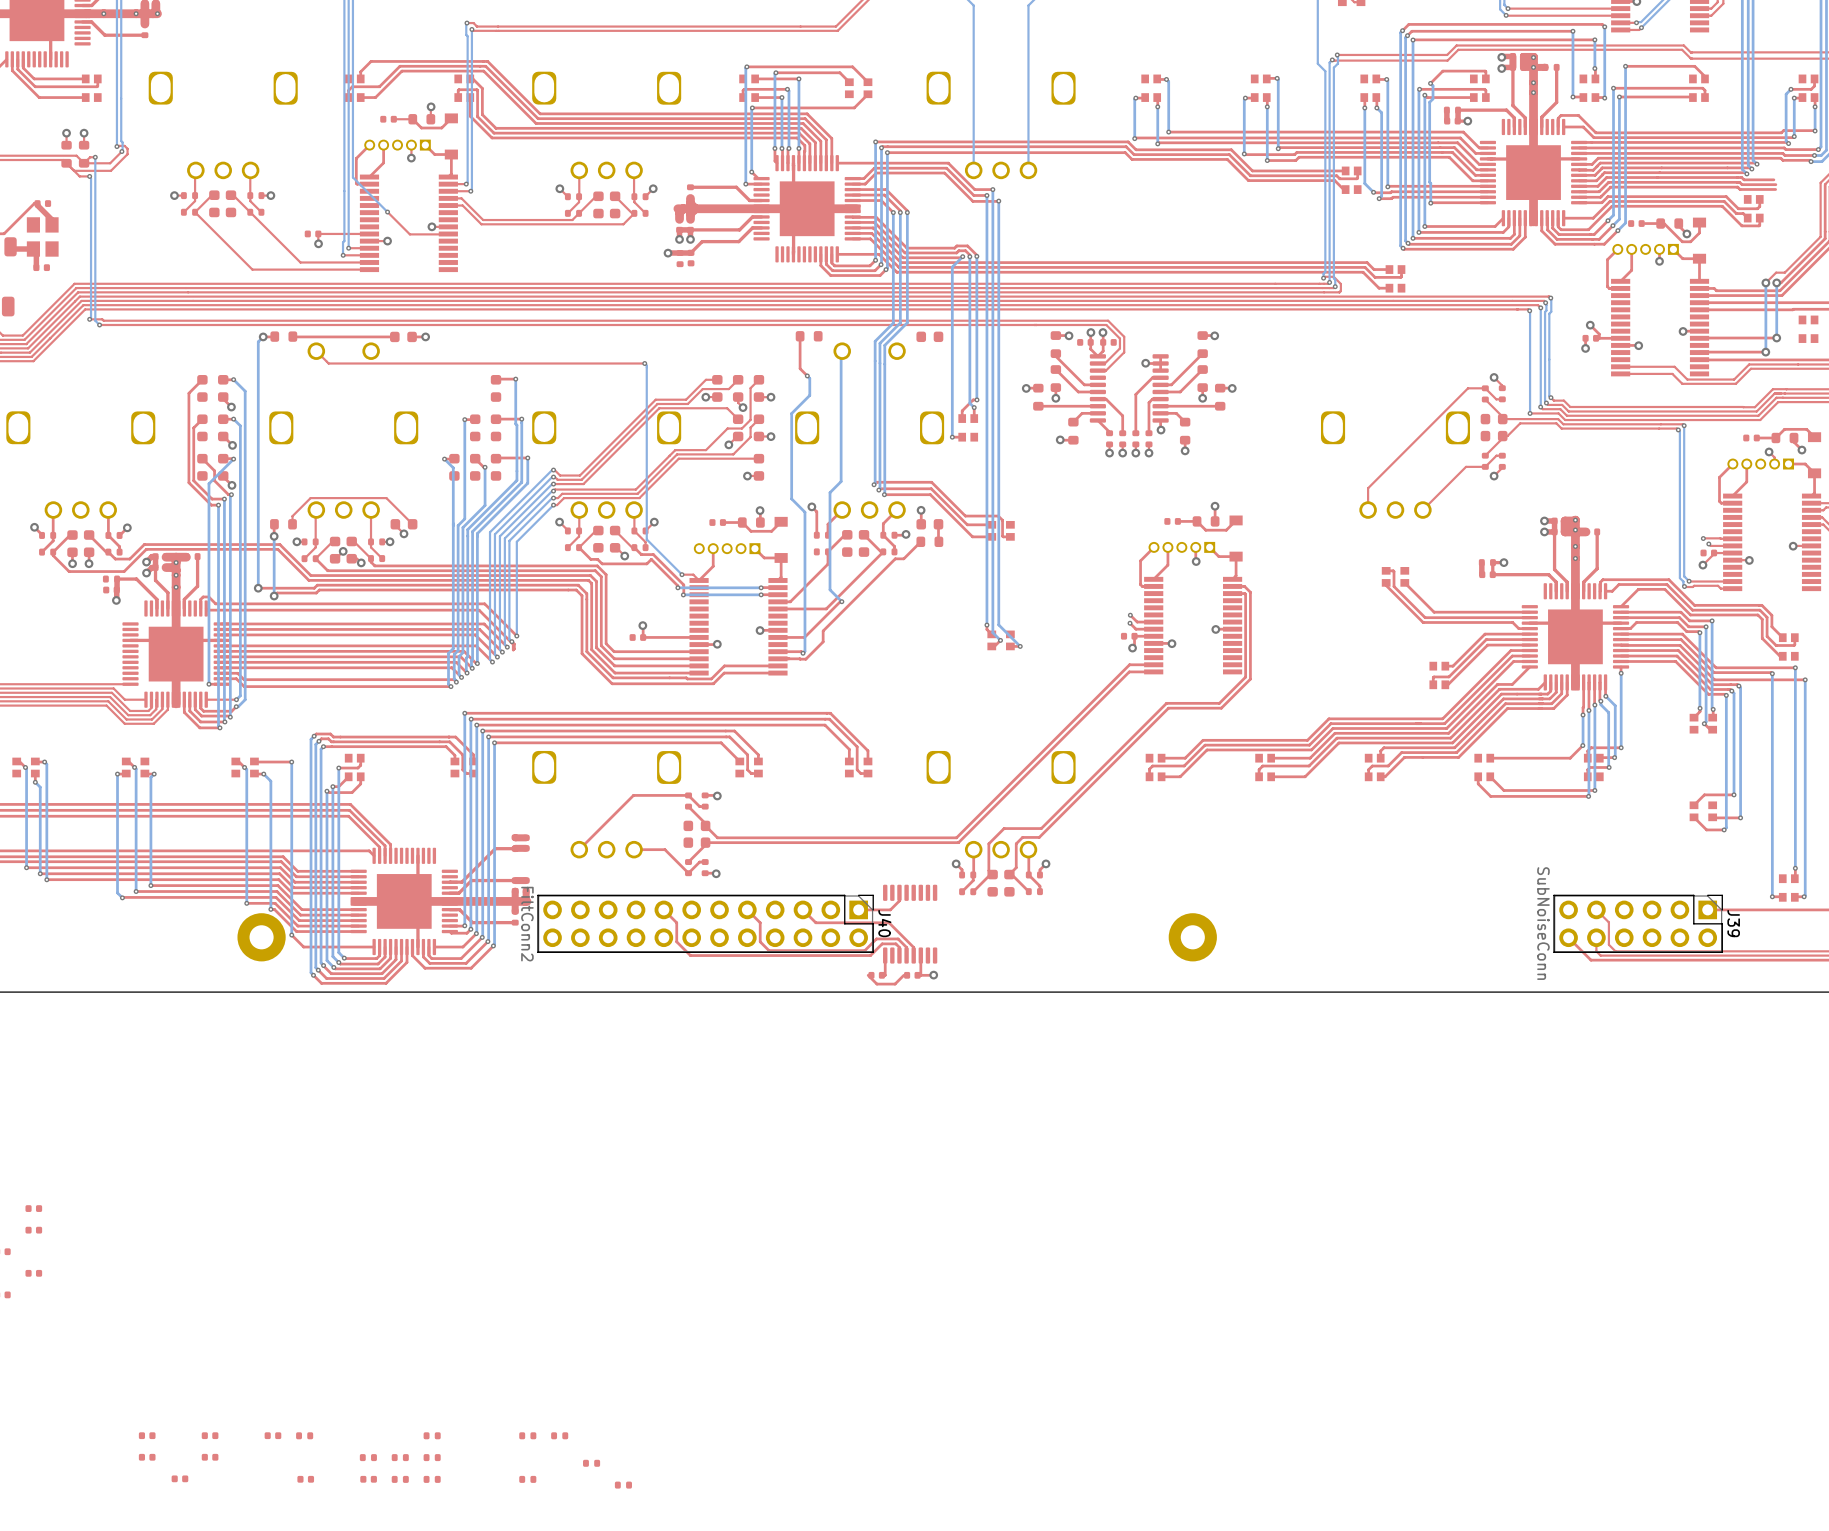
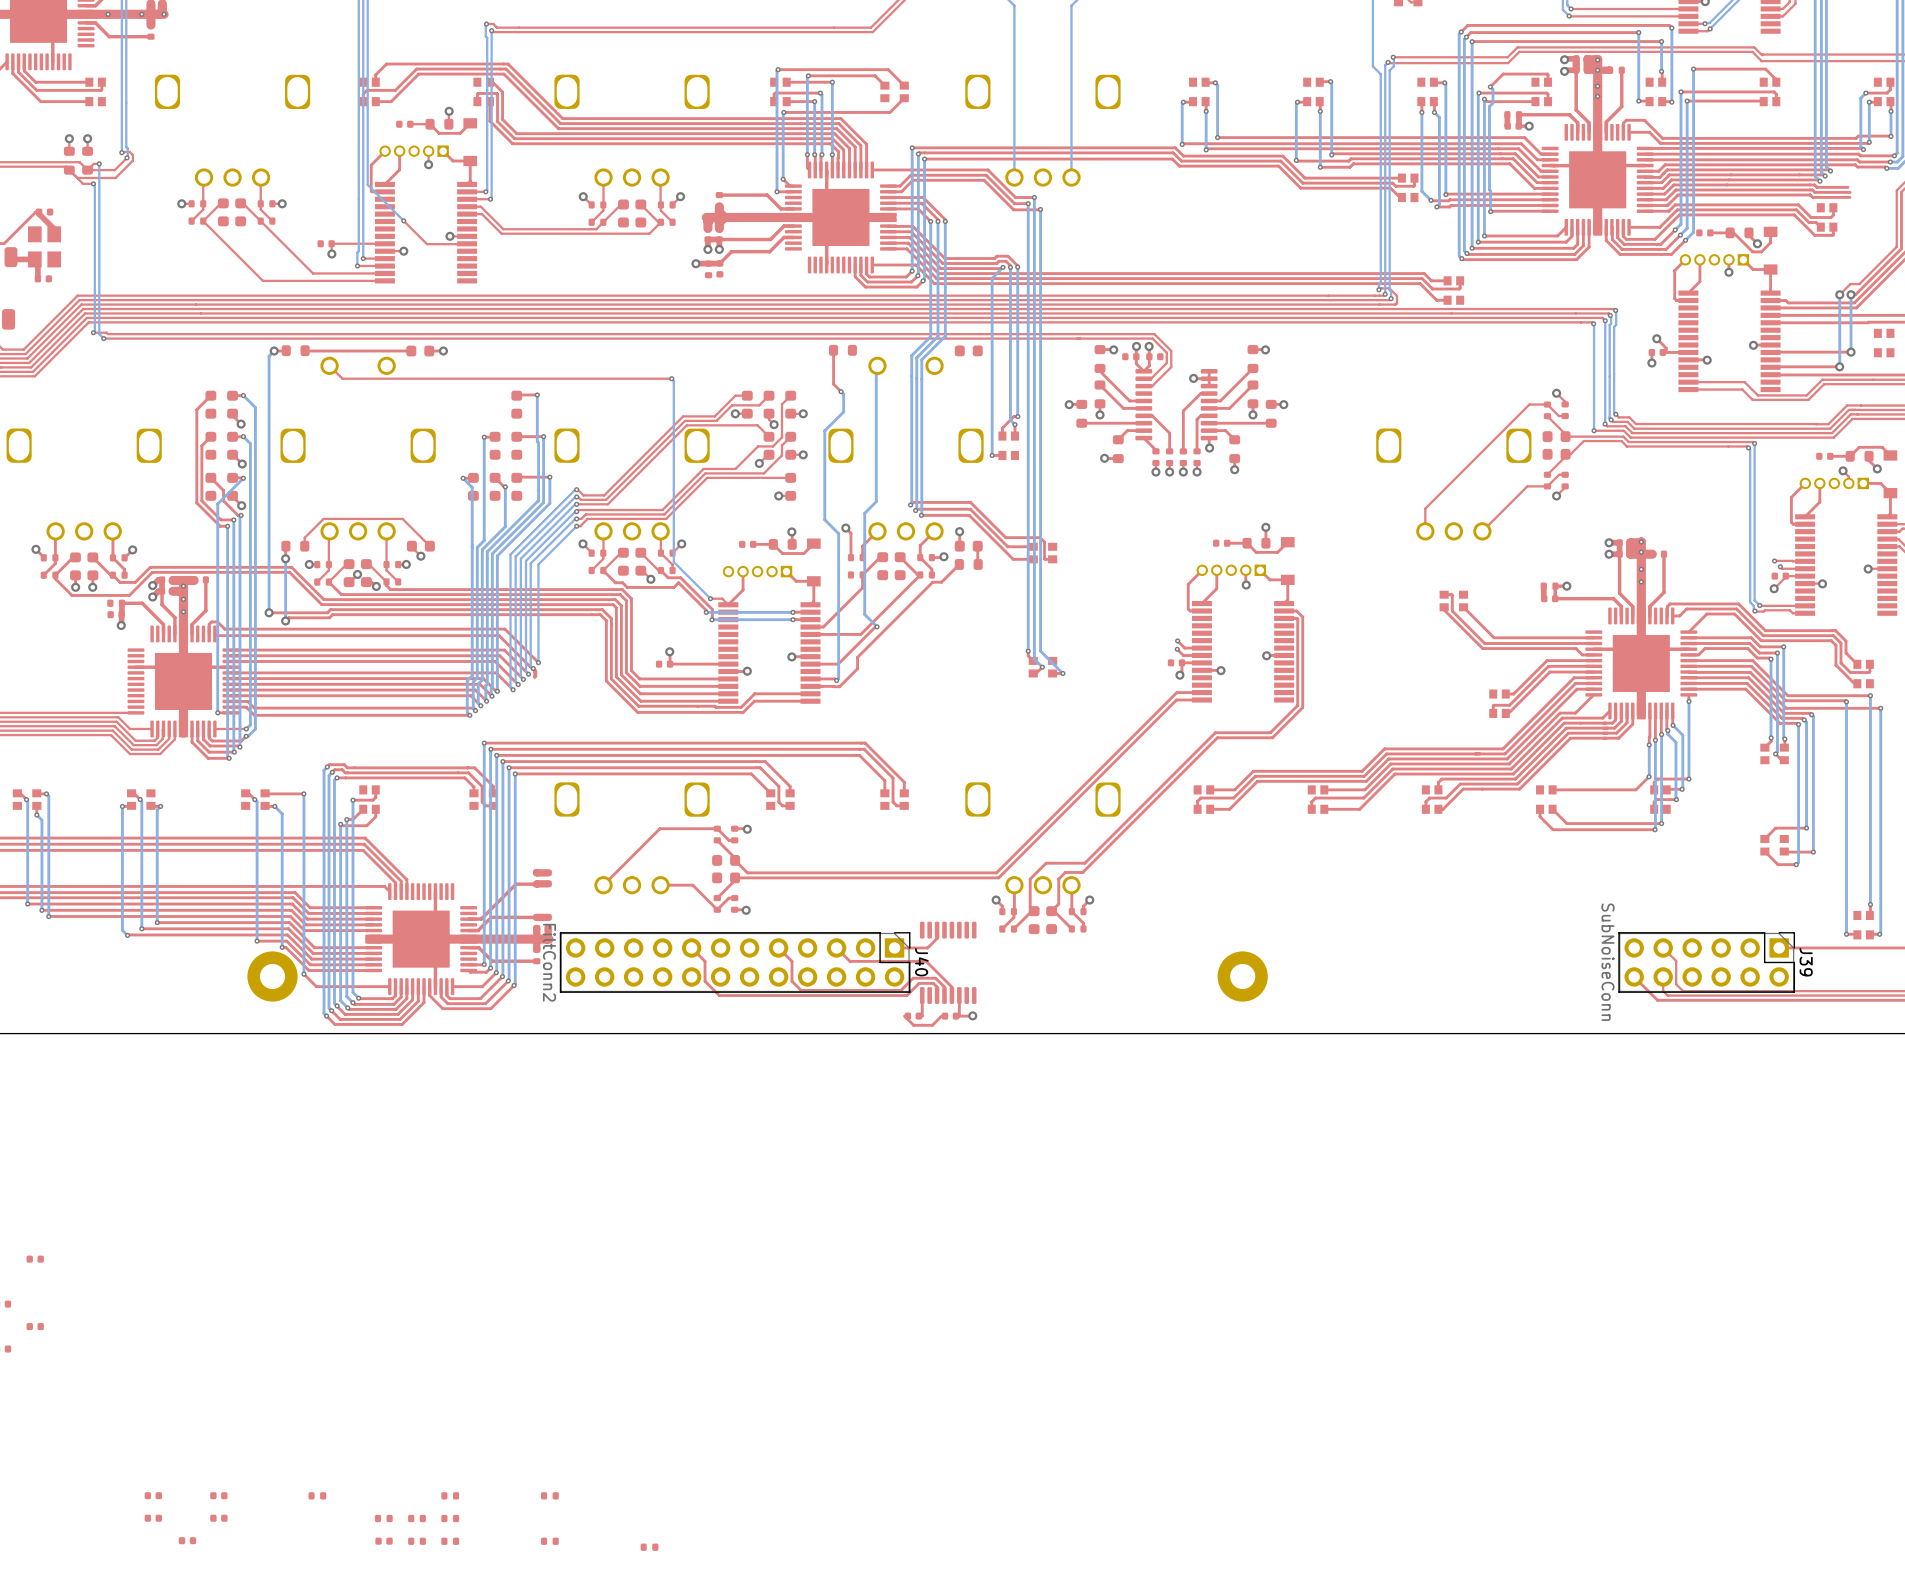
part: (33, 1230) -> none
part: (272, 1435) -> none
part: (559, 1435) -> none
part: (591, 1463) -> none
part: (305, 1479) -> none

